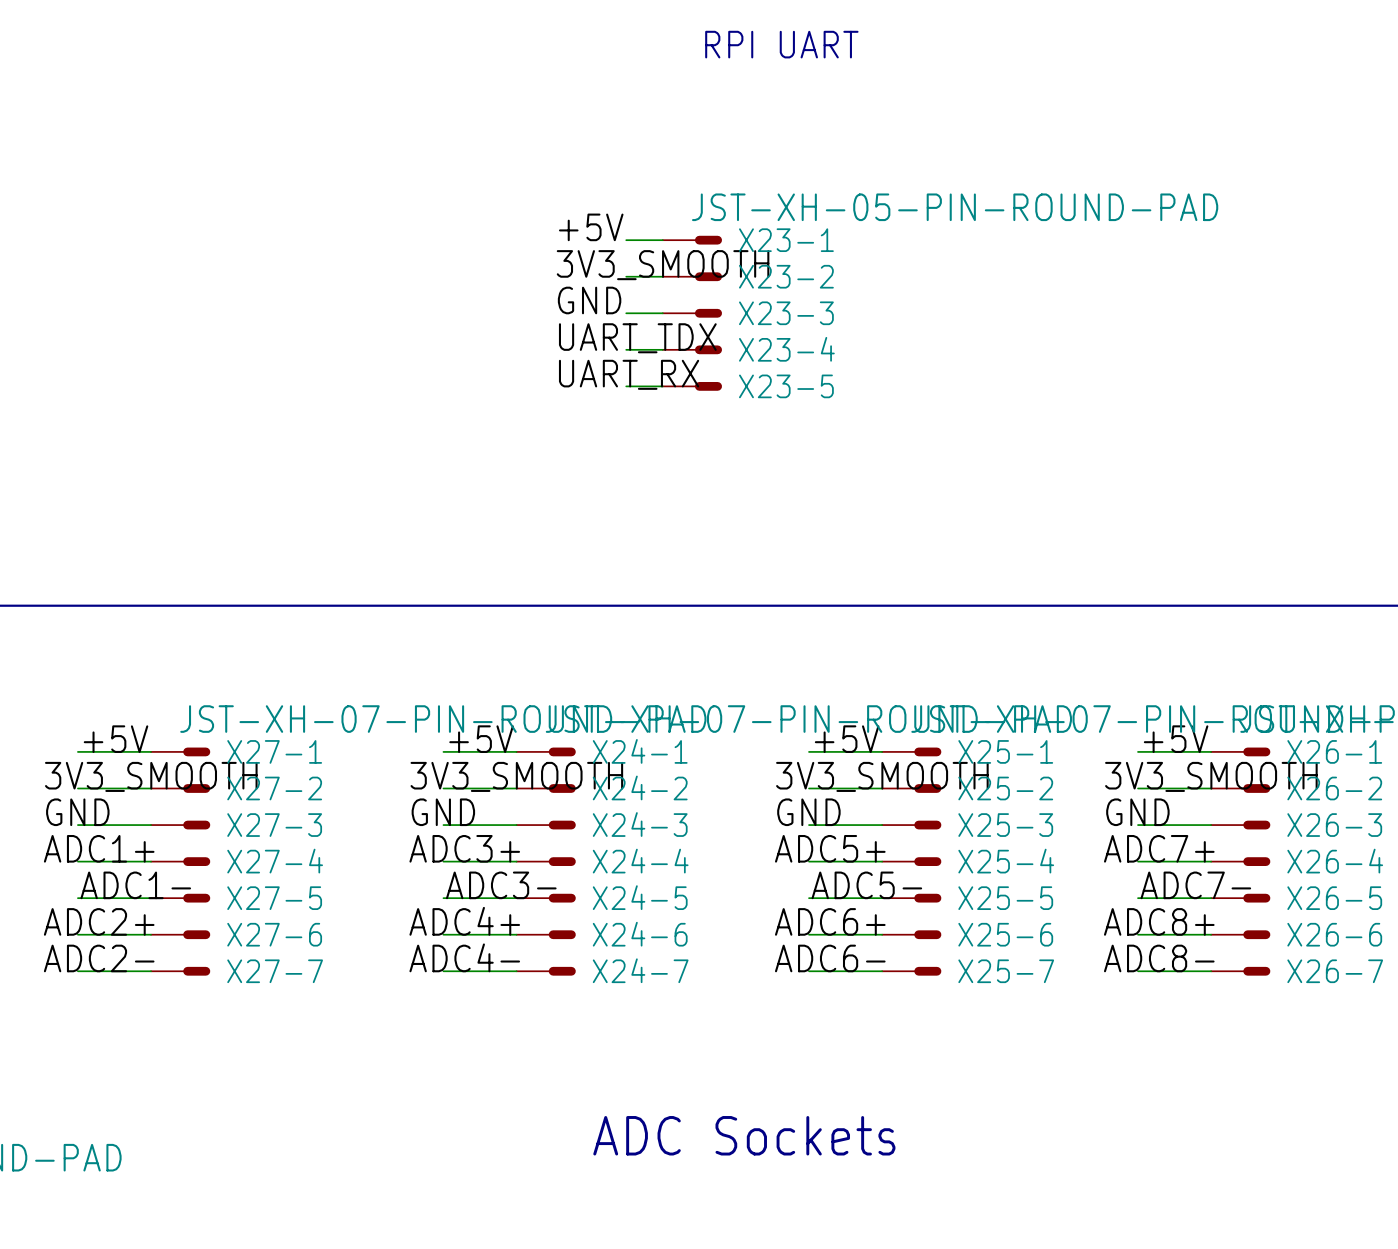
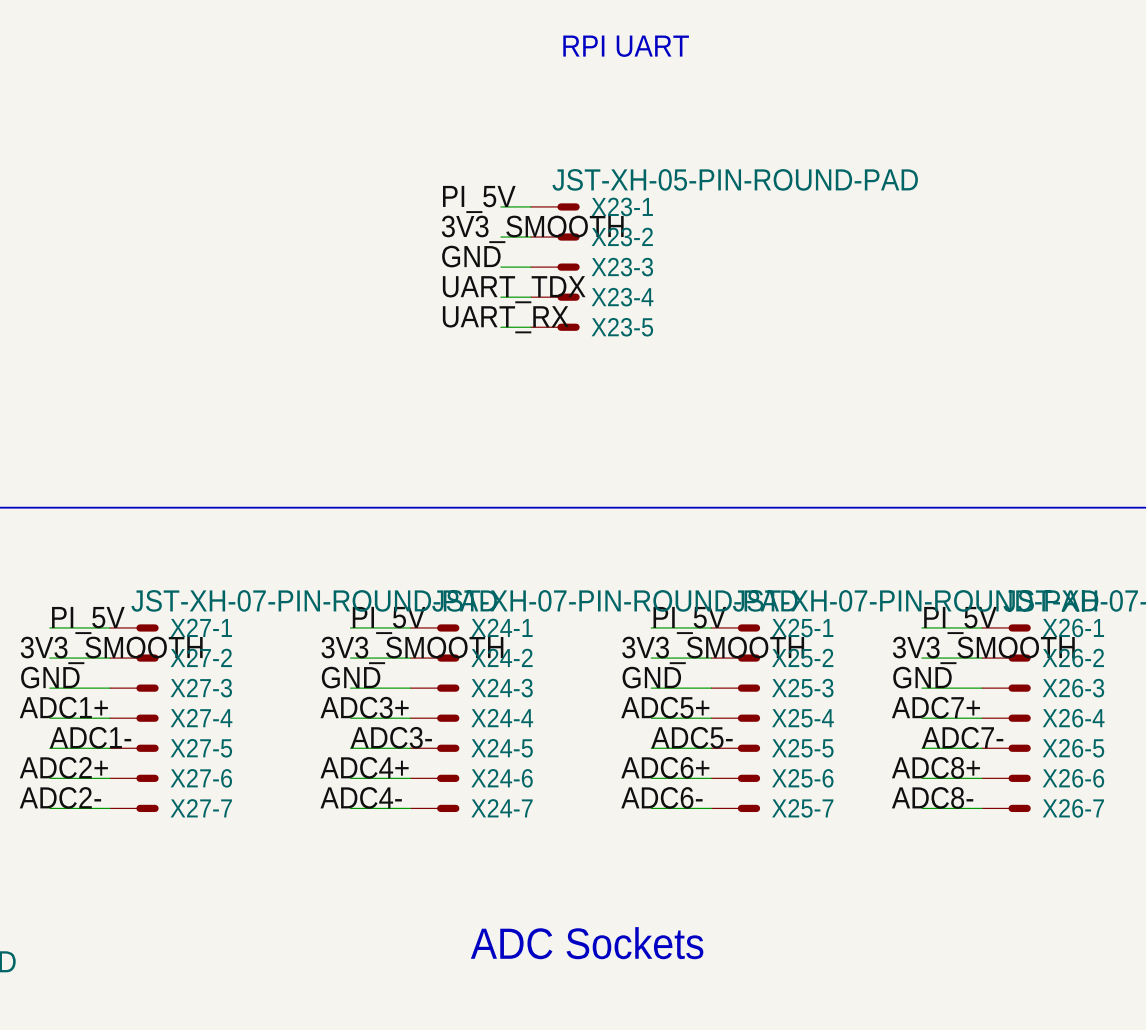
label: +5V (591, 227) -> PI_5V (479, 199)
label: +5V (116, 739) -> PI_5V (88, 620)
label: +5V (481, 739) -> PI_5V (389, 620)
label: +5V (847, 739) -> PI_5V (689, 620)
label: +5V (1176, 739) -> PI_5V (960, 620)

